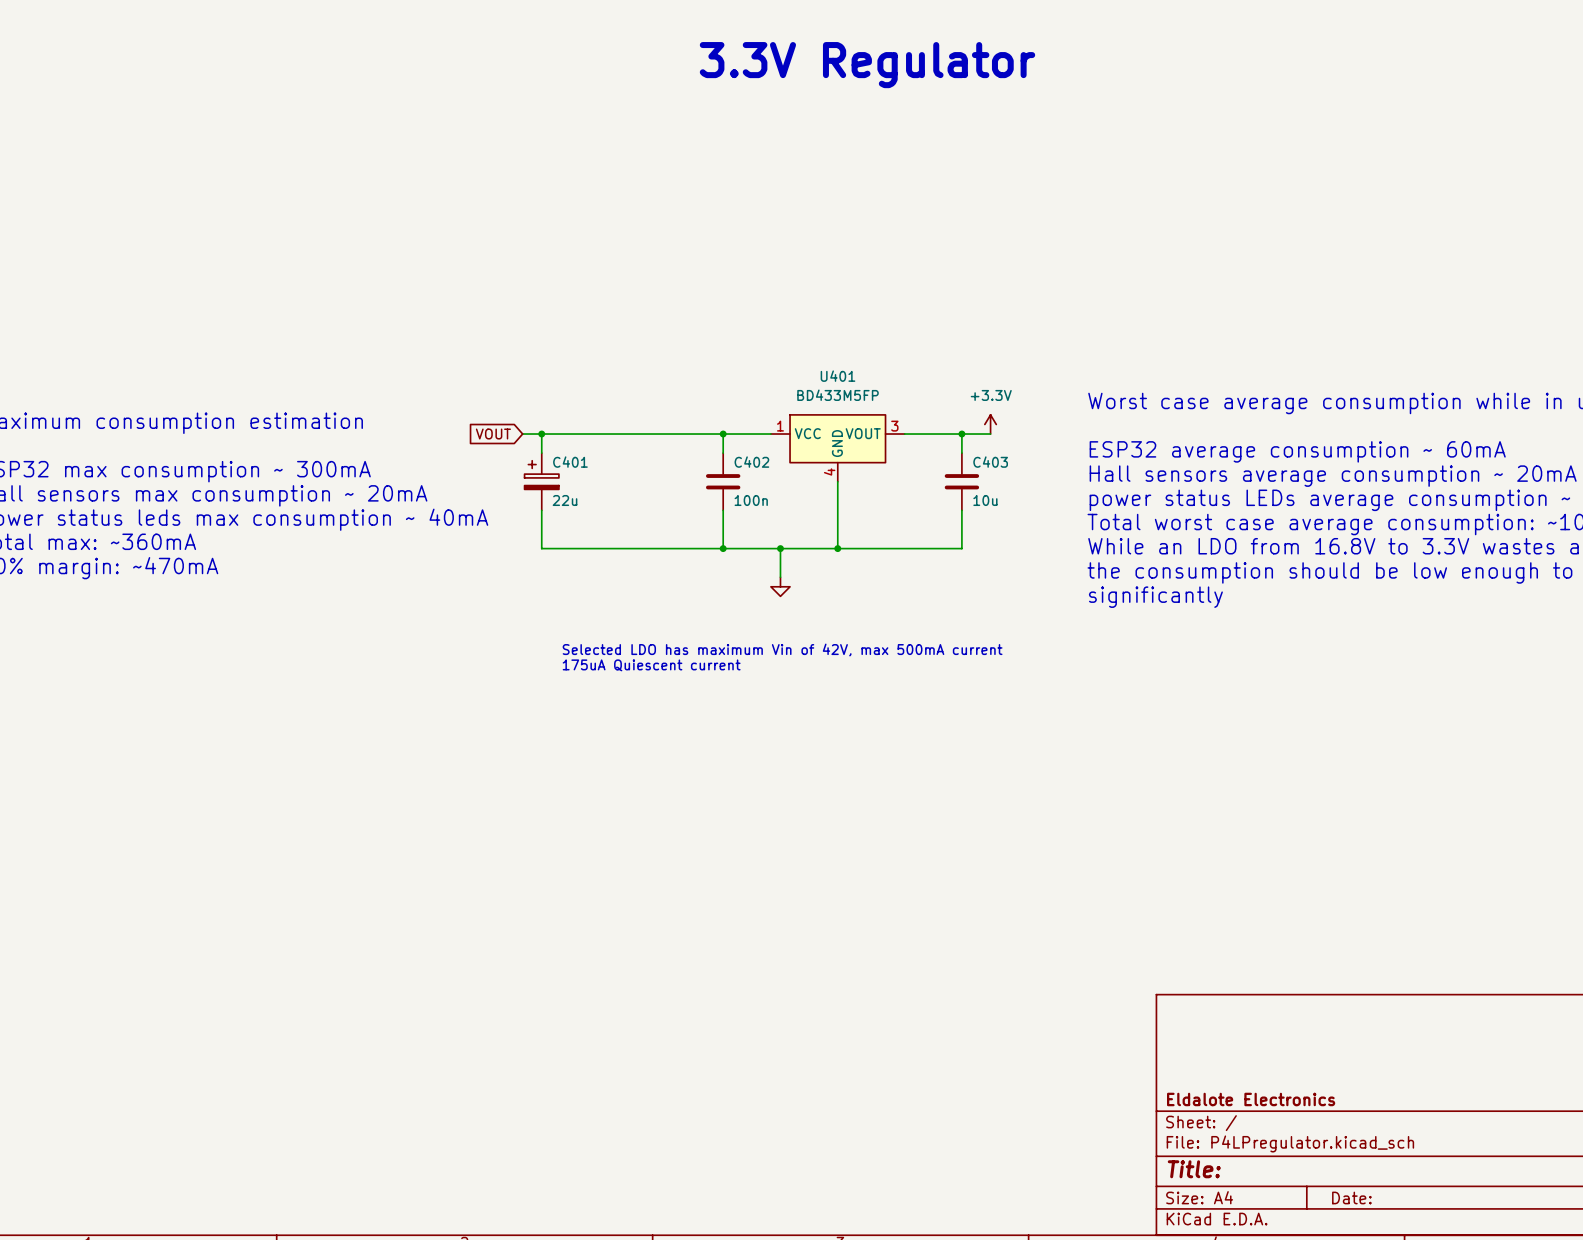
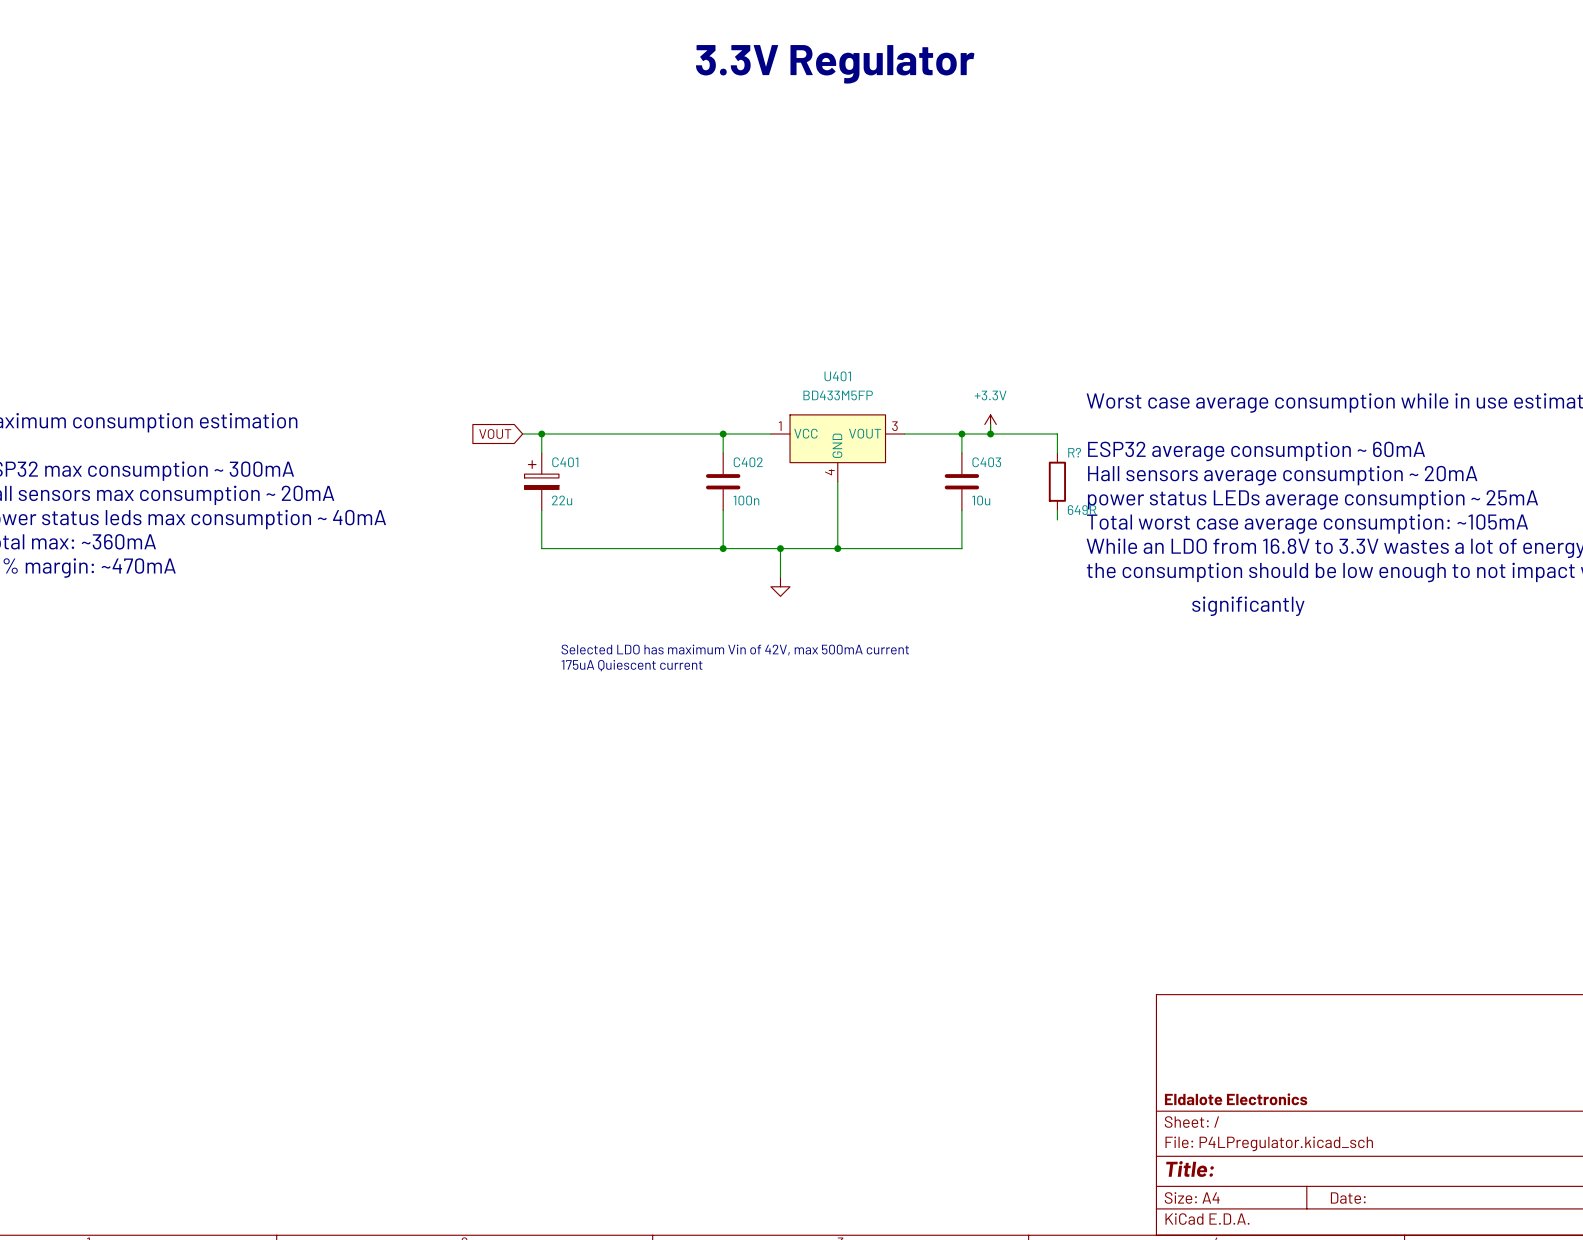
wire: none -> (990, 424) (990, 434) (1057, 434) (1057, 453)
junction: none -> (990, 434)
R?: none -> 649R (1057, 481)
wire: none -> (1057, 510) (1057, 519)
text position: significantly (1155, 597) -> significantly (1248, 606)

